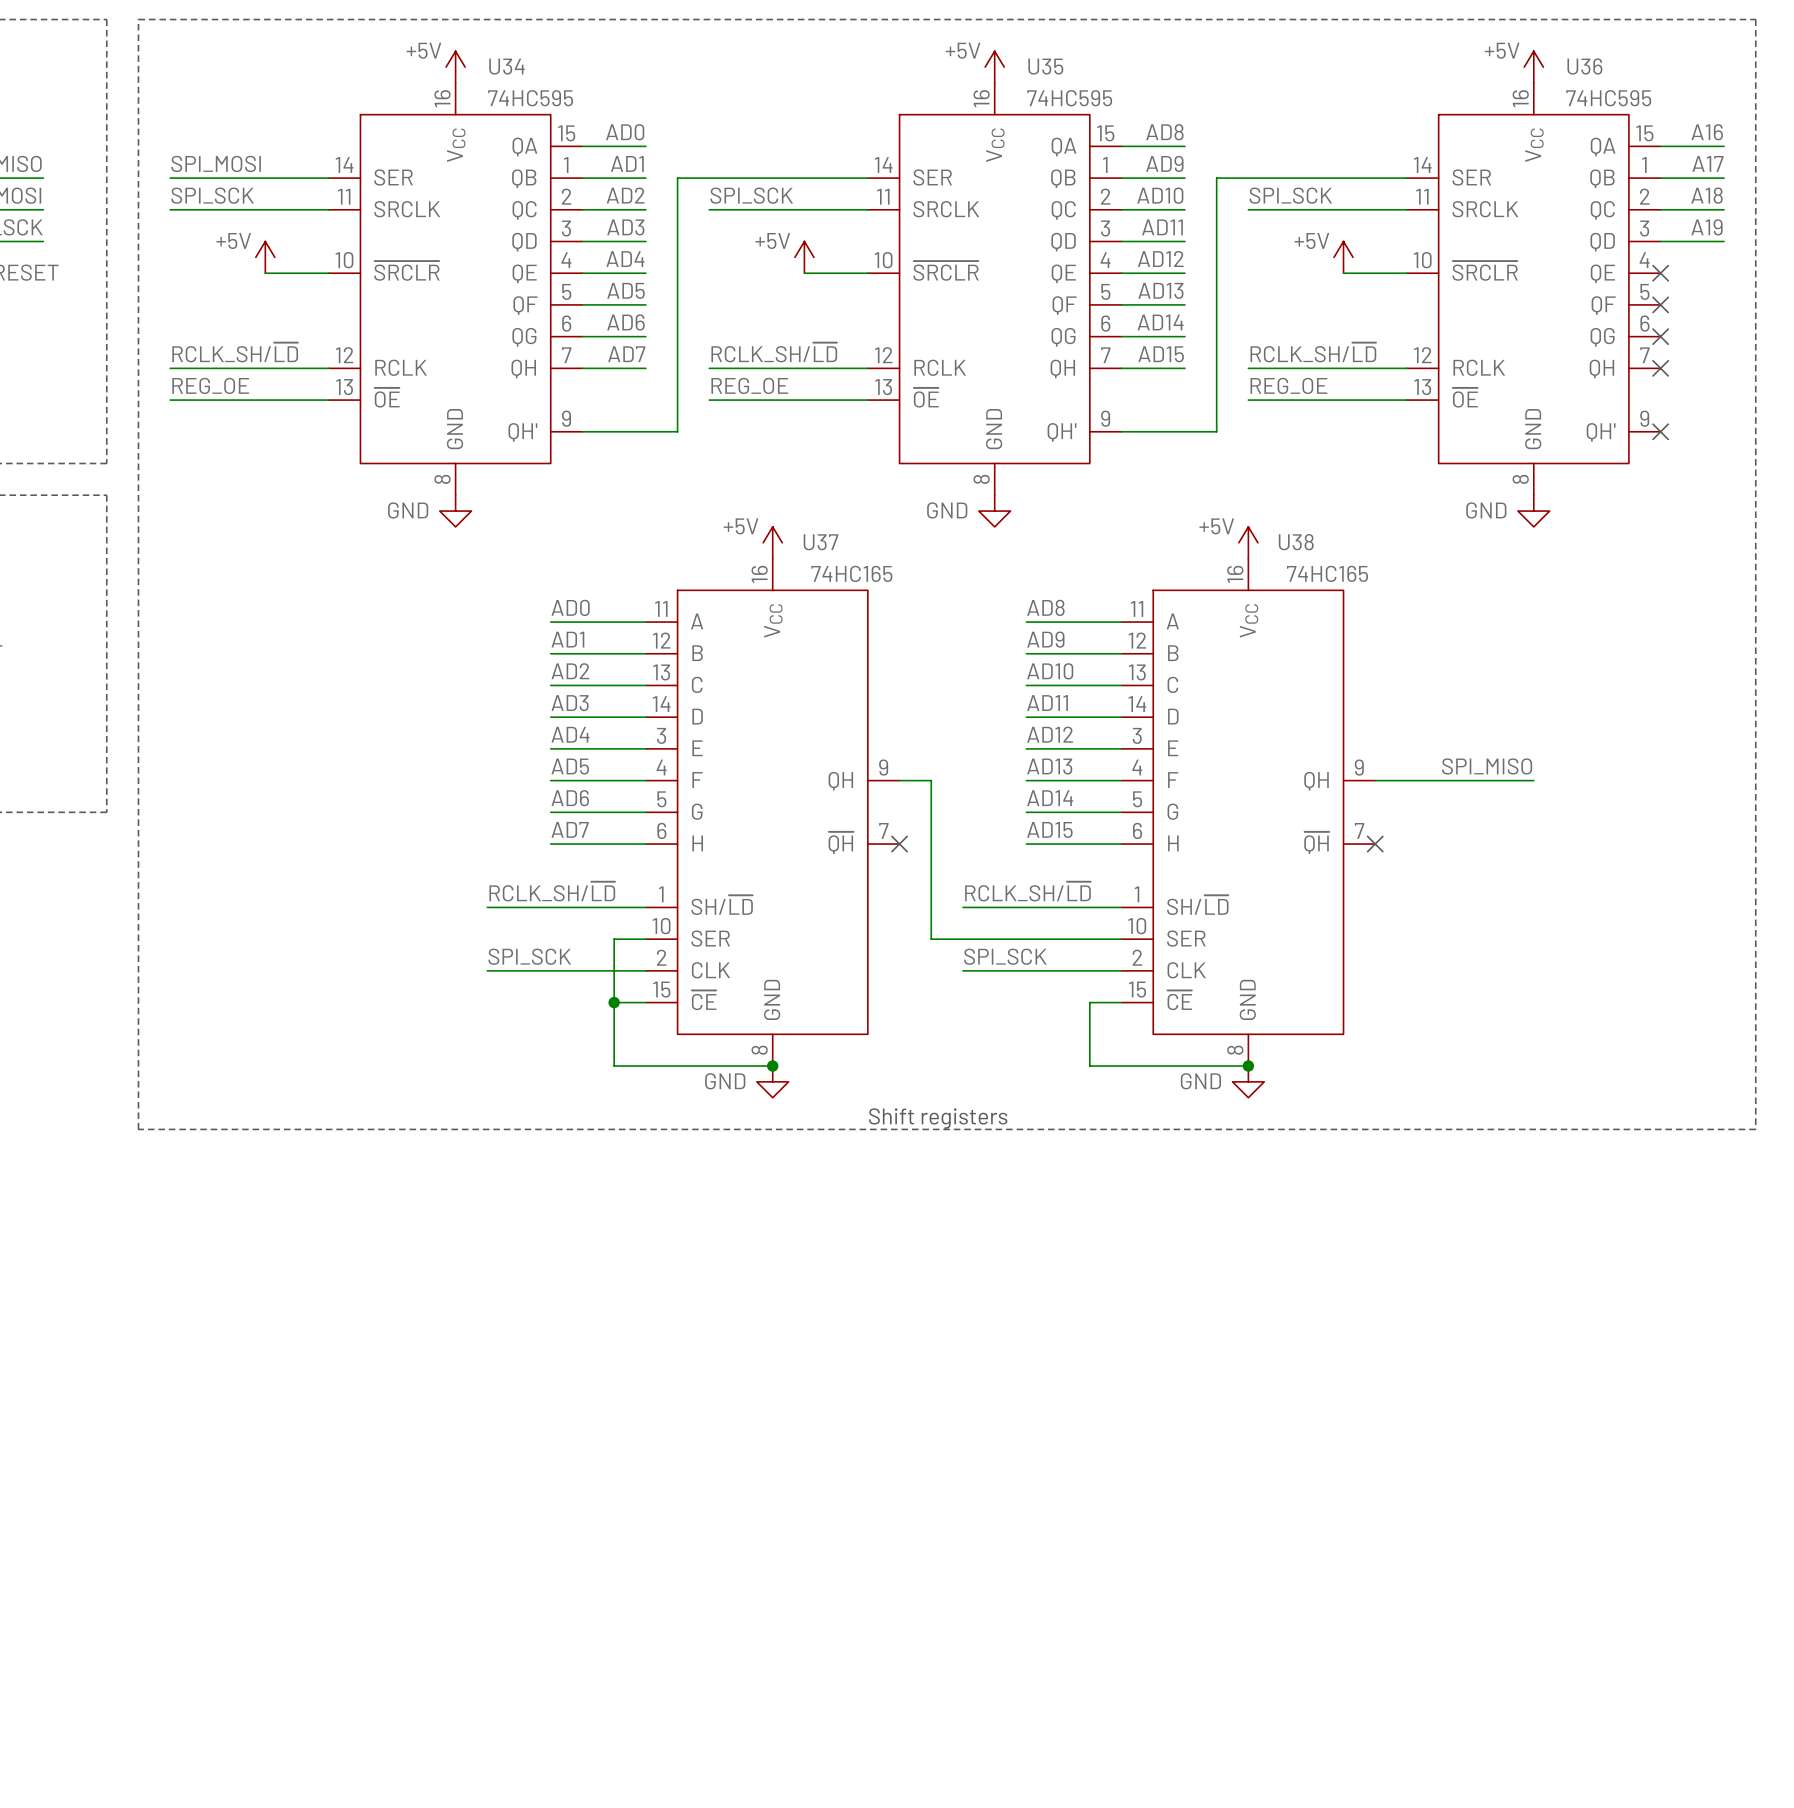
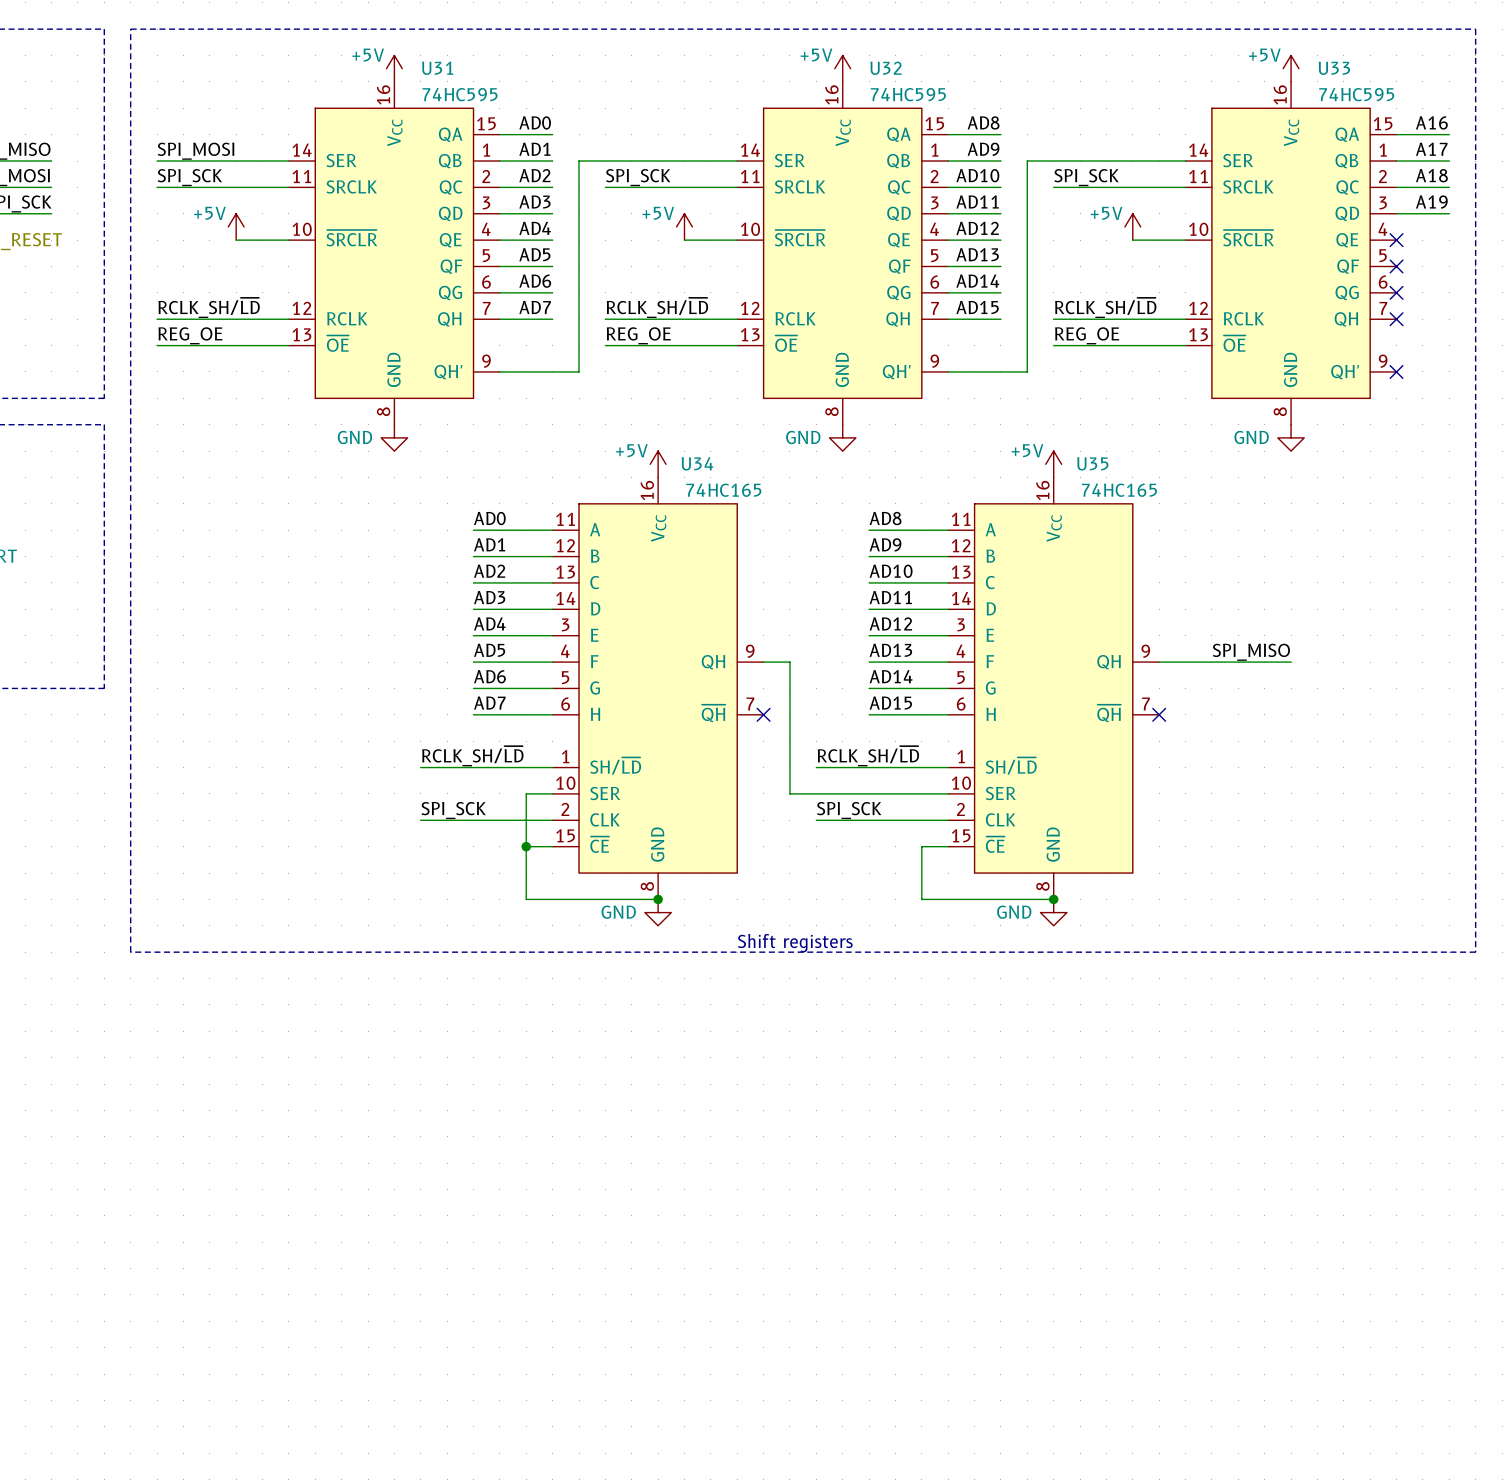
U34 name: U34 (507, 66) -> U31 (437, 68)
U35 name: U35 (1045, 66) -> U32 (886, 68)
U36 name: U36 (1584, 66) -> U33 (1334, 68)
U37 name: U37 (821, 542) -> U34 (697, 463)
U38 name: U38 (1296, 542) -> U35 (1092, 463)

